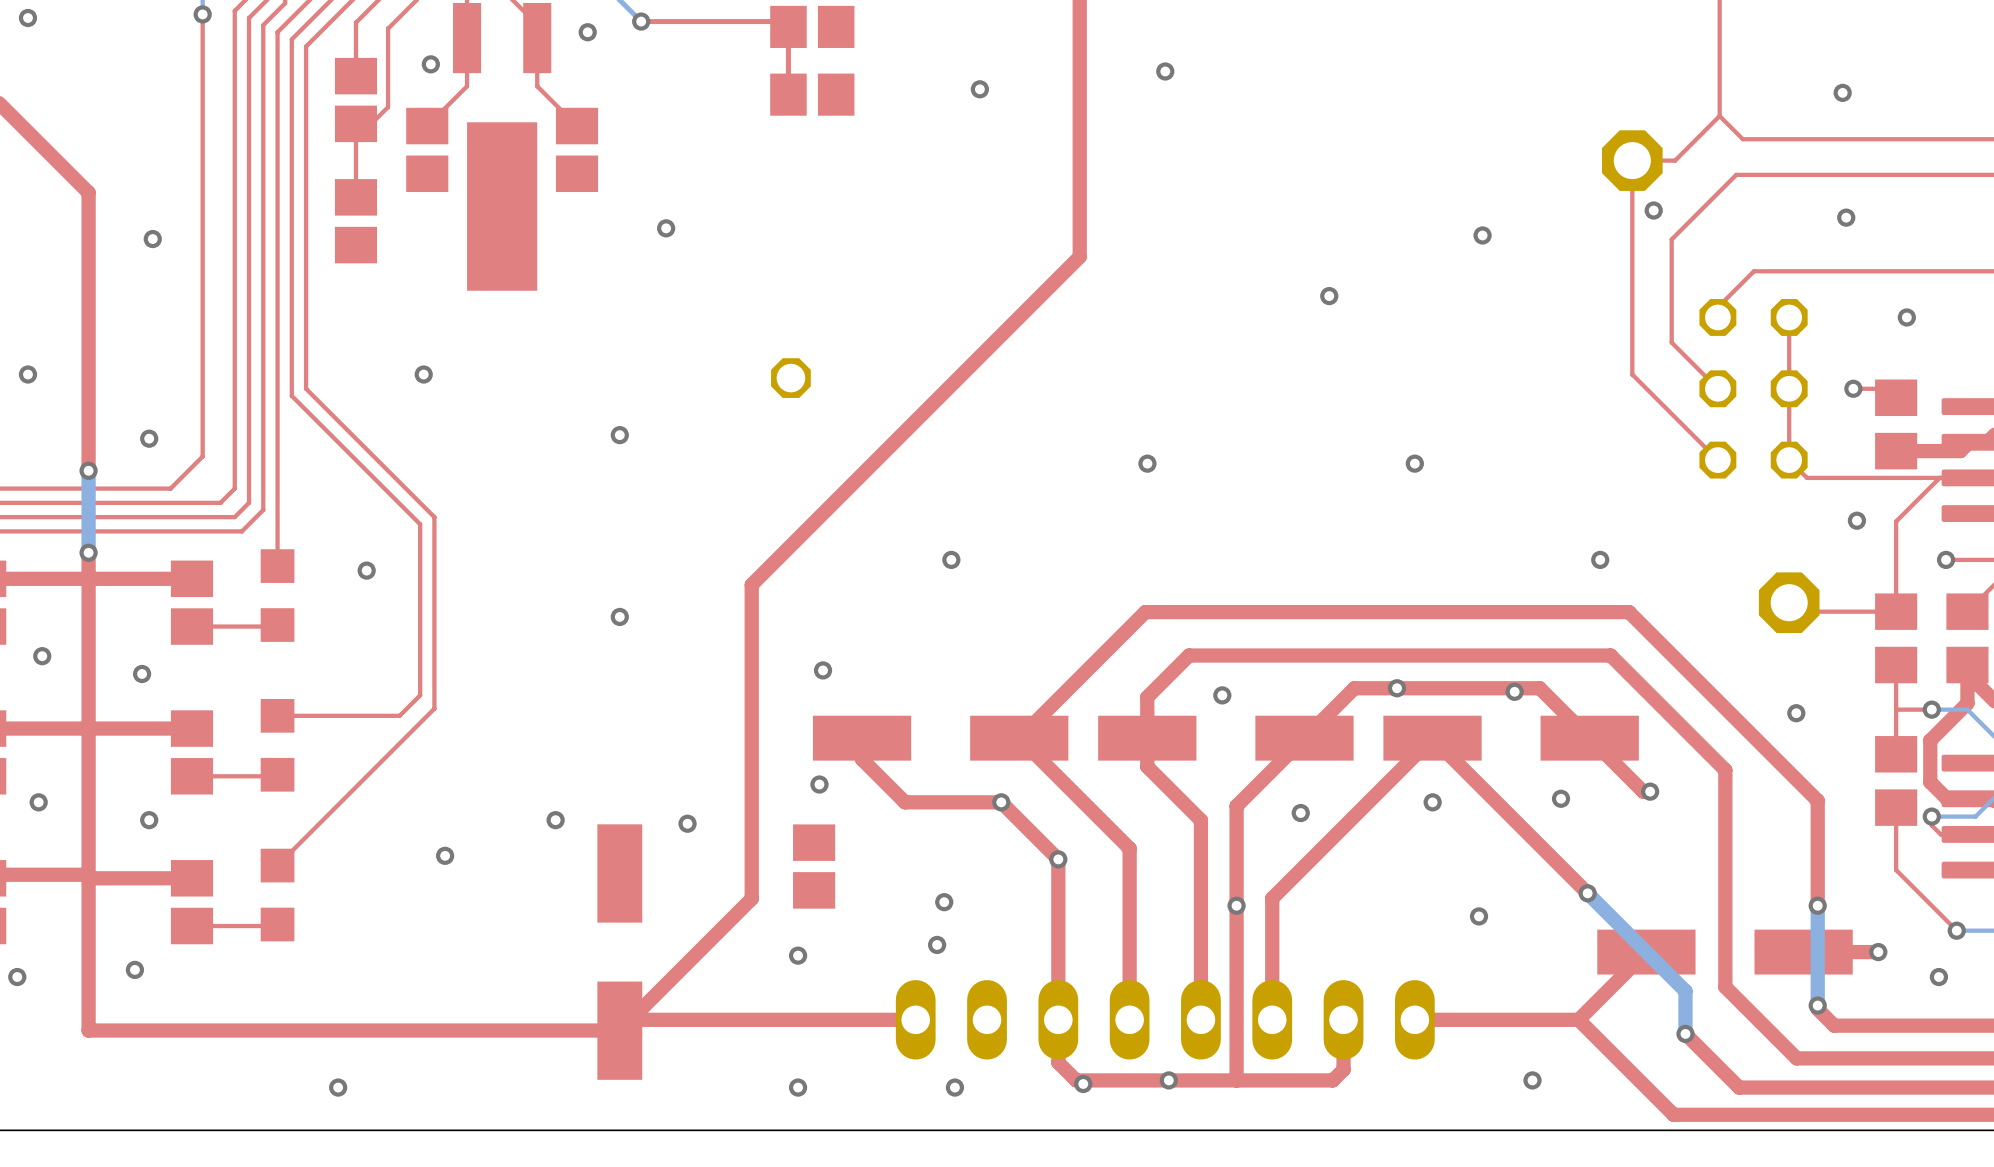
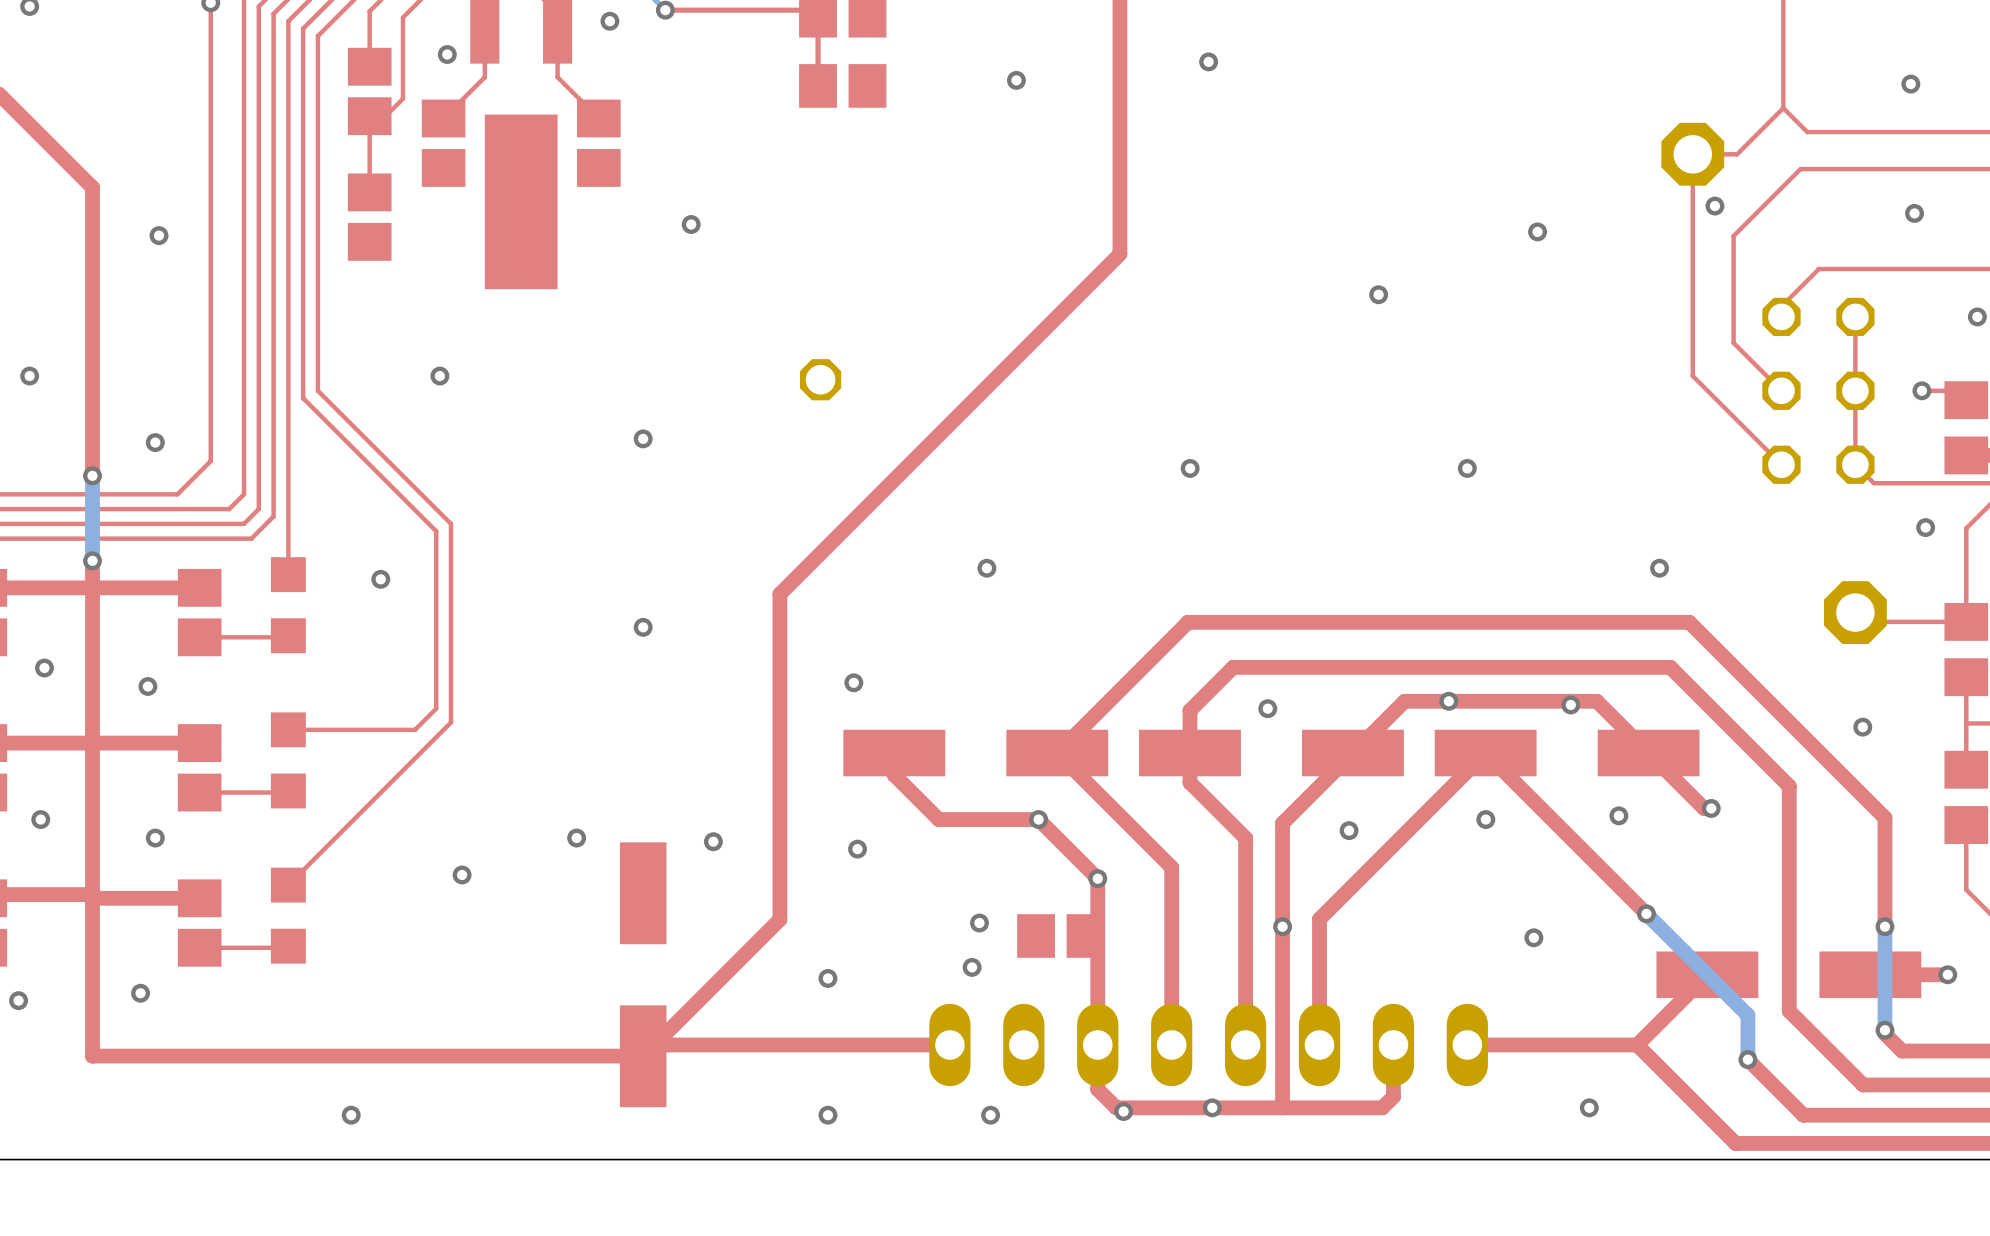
via position: (819, 784) -> (857, 849)
part rotation: 0° (814, 866) -> 90° clockwise (1060, 935)
part position: (814, 866) -> (1060, 935)

